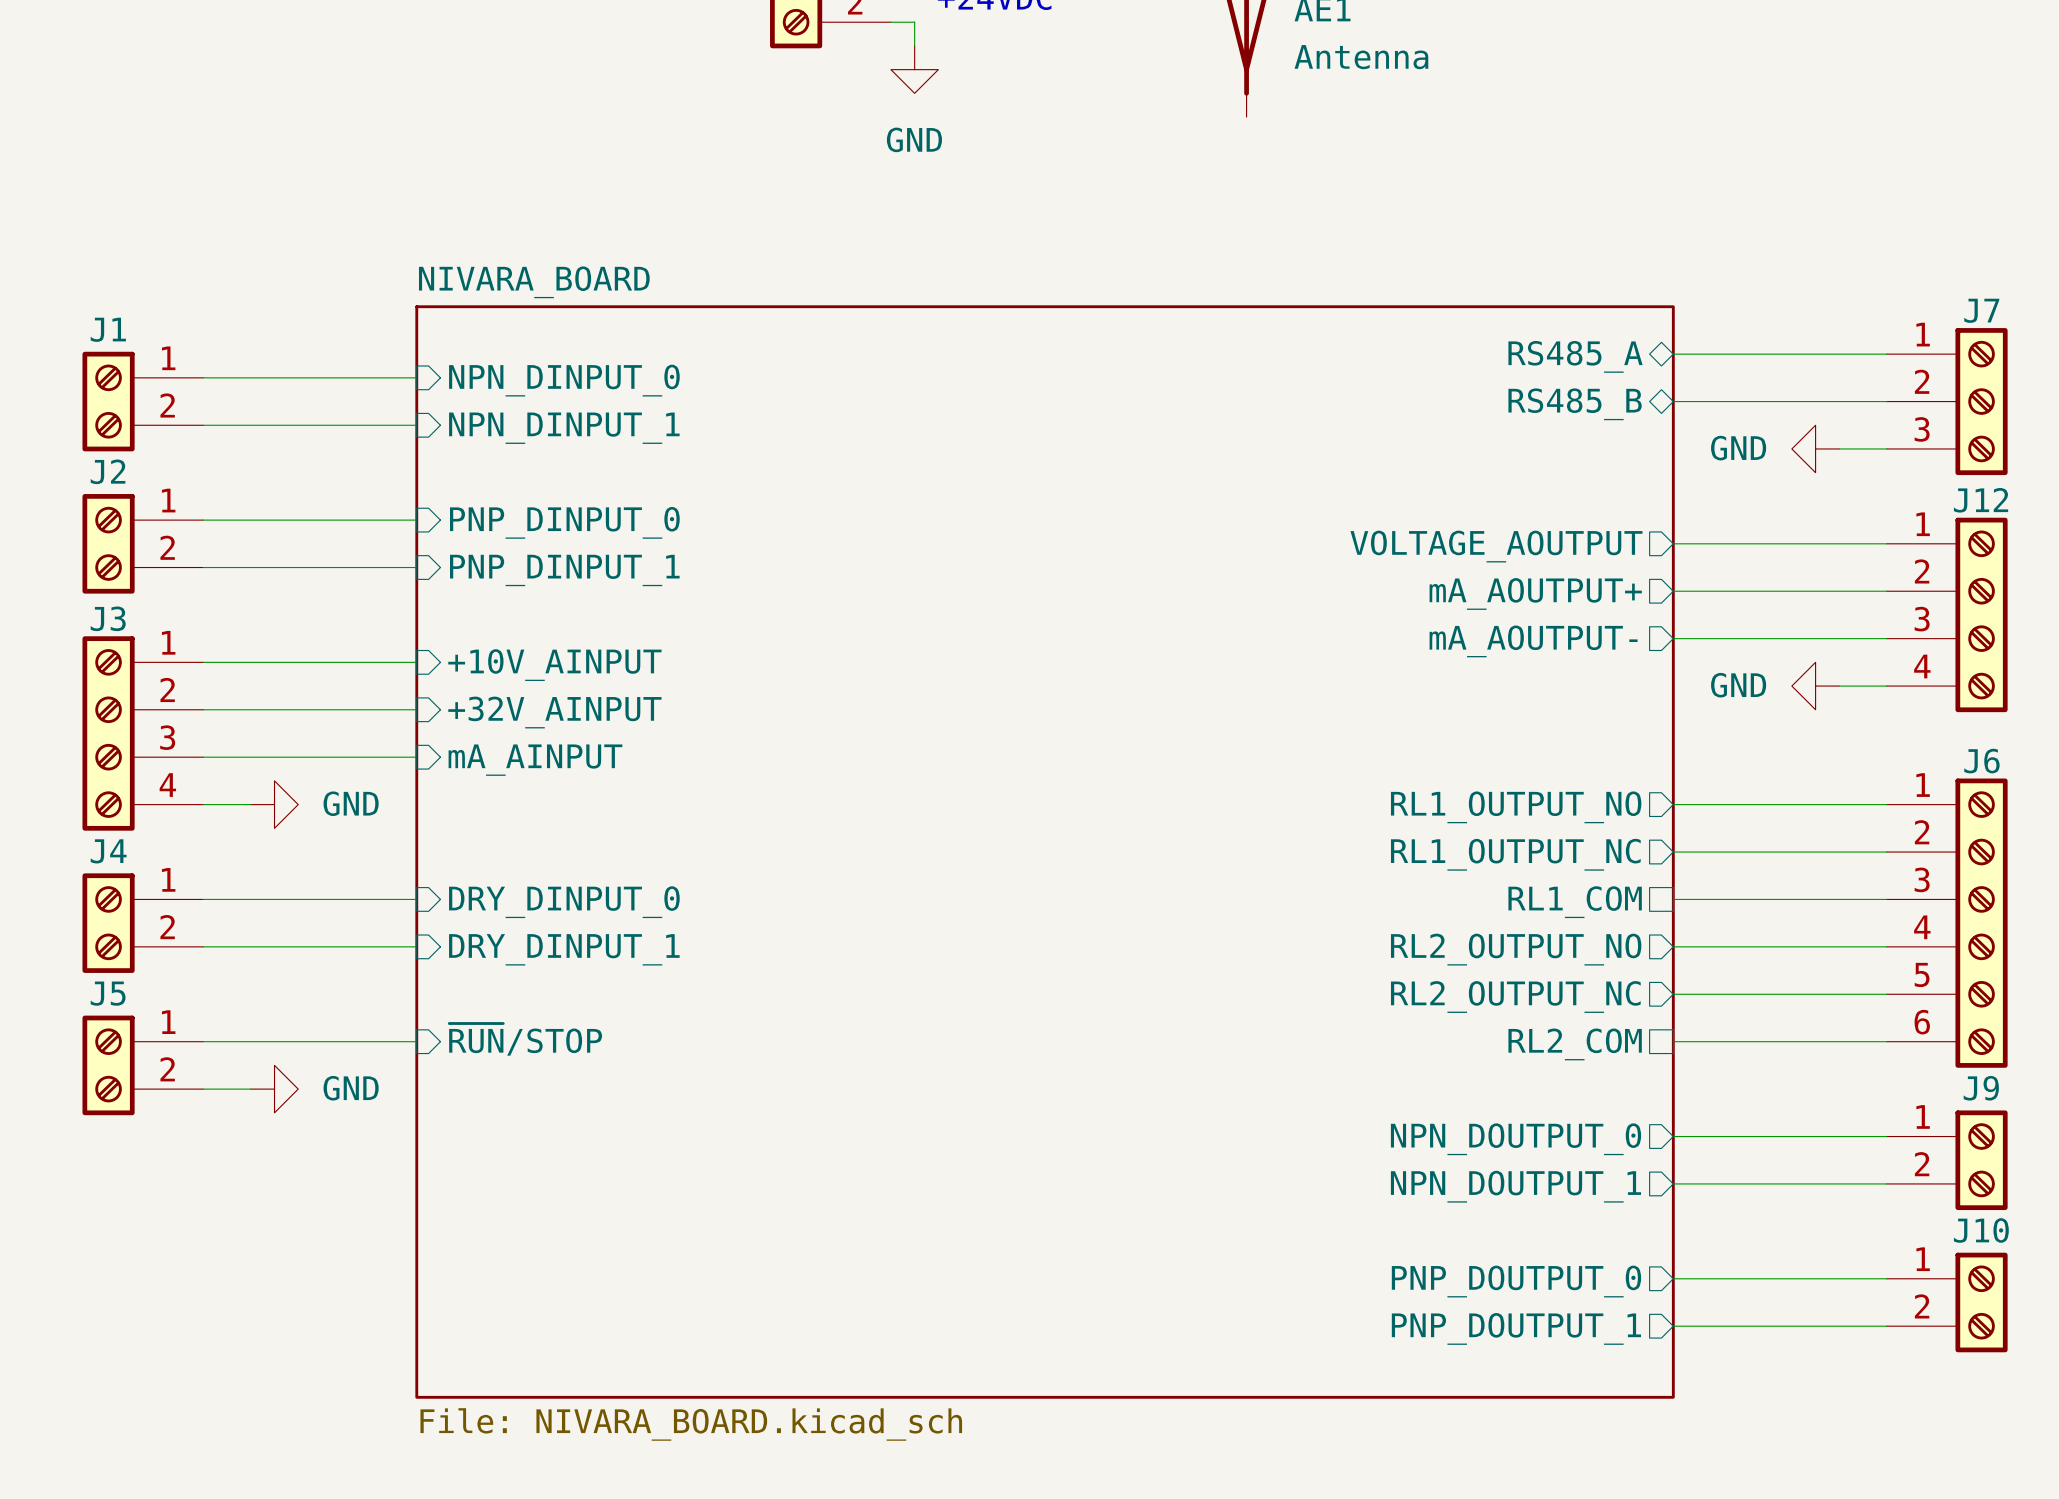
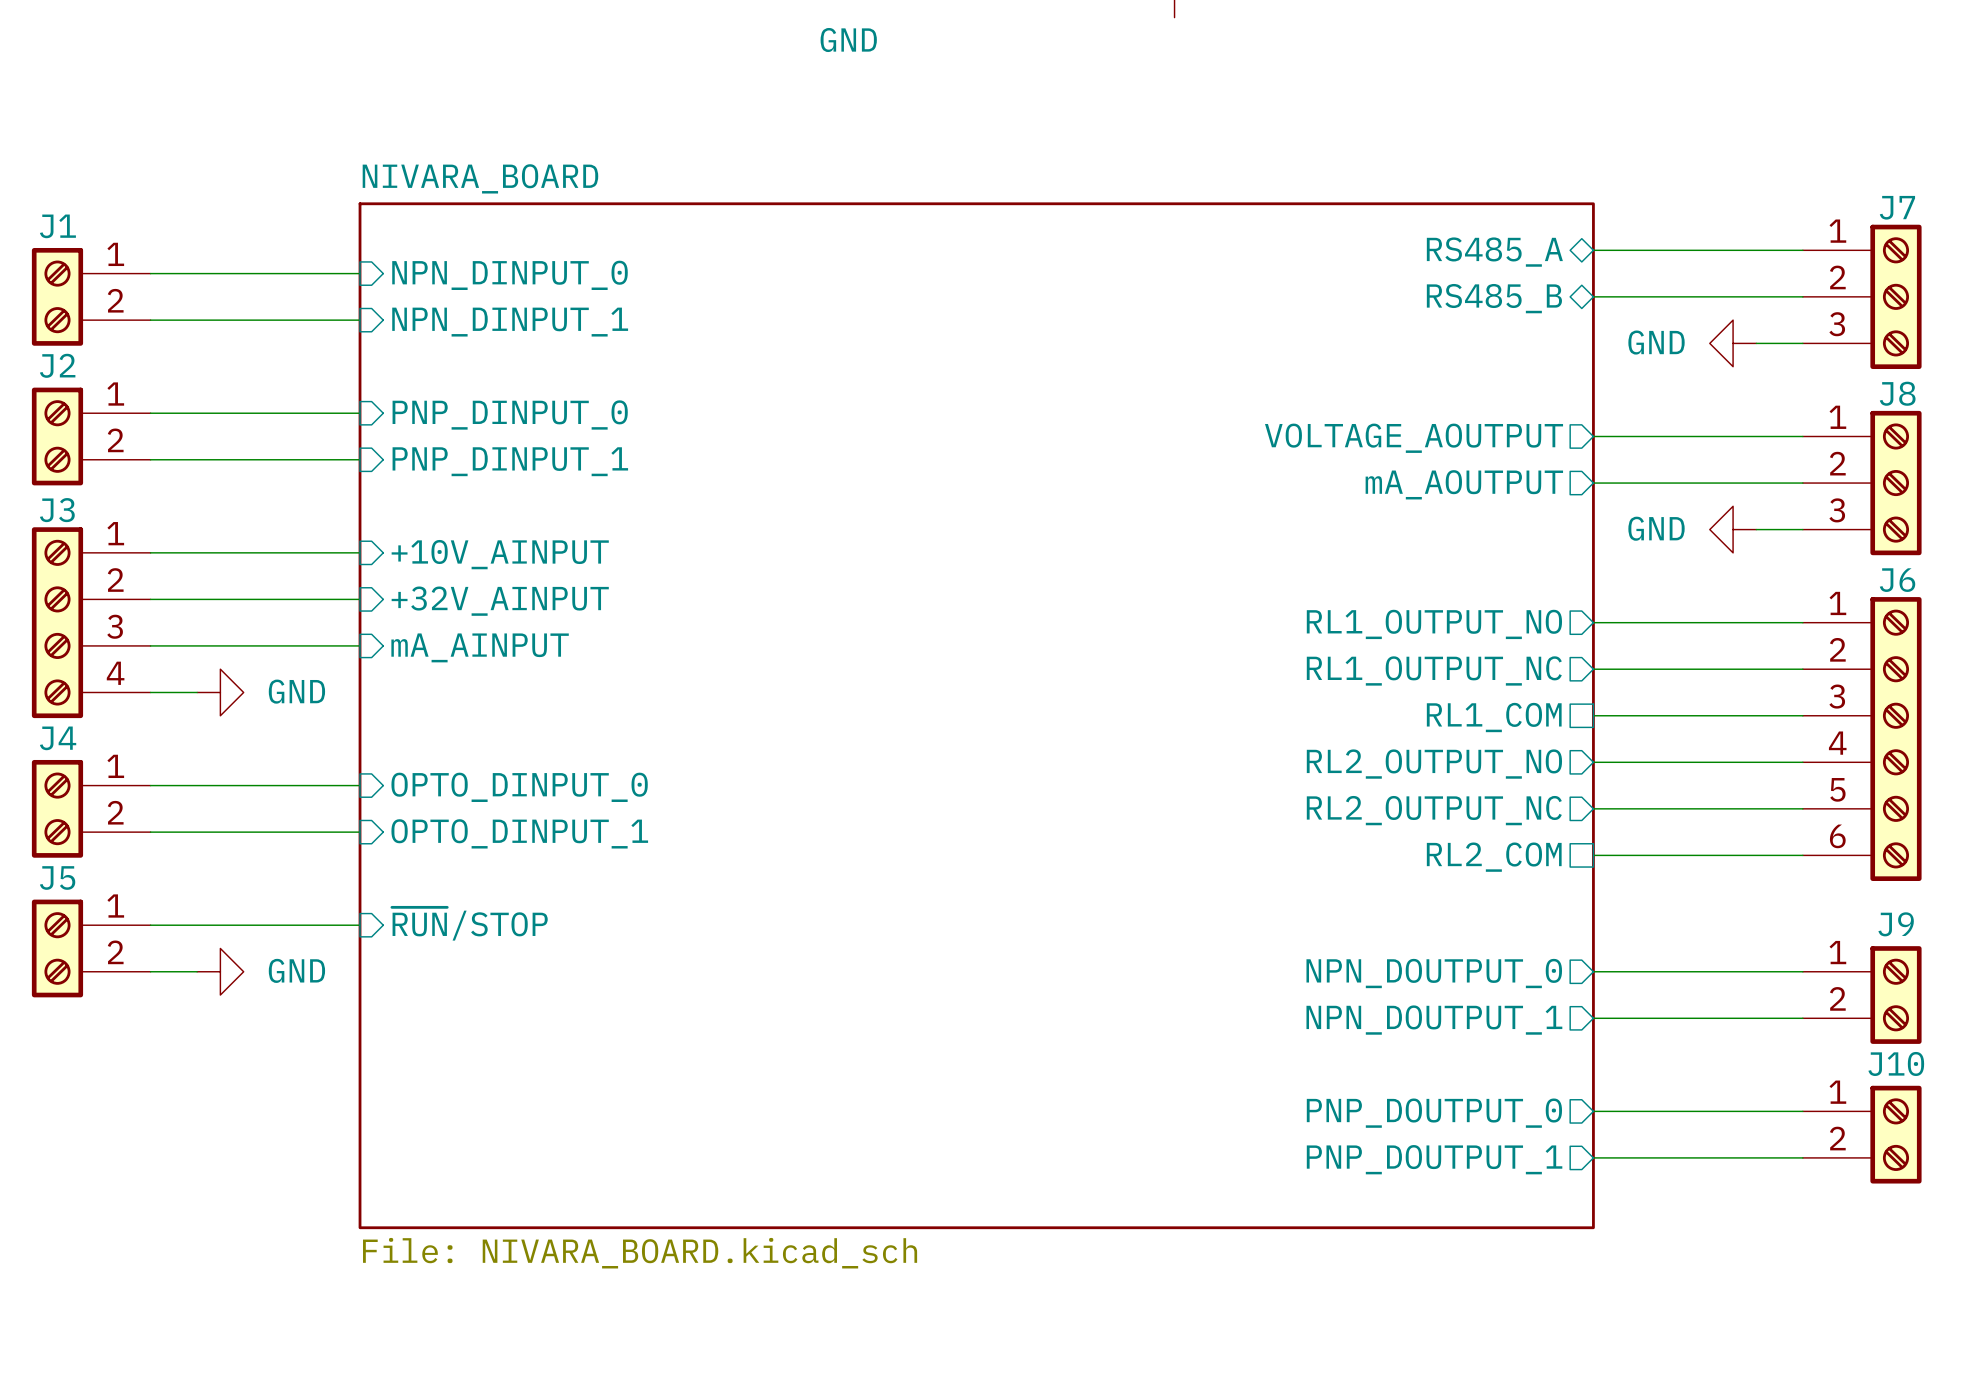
J8: none -> (1862, 483)
sheet pin: mA_AOUTPUT+ (1535, 593) -> mA_AOUTPUT (1464, 484)
J12: (1947, 614) -> none
wire: (1673, 638) (1839, 638) -> none
sheet pin: mA_AOUTPUT- (1533, 641) -> none
power symbol position: GND (1815, 686) -> GND (1733, 529)
wire: (1839, 686) (1886, 686) -> none
wire: (1673, 804) (1886, 804) -> (1593, 622) (1802, 622)
sheet pin position: RL1_OUTPUT_NO (1516, 807) -> RL1_OUTPUT_NO (1434, 624)
sheet NIVARA_BOARD: none -> File: NIVARA_BOARD.kicad_sch (976, 715)
sheet NIVARA_BOARD: File: NIVARA_BOARD.kicad_sch (1045, 852) -> none
wire: (1673, 852) (1886, 852) -> (1593, 669) (1802, 669)
sheet pin position: RL1_OUTPUT_NC (1515, 854) -> RL1_OUTPUT_NC (1434, 670)
wire: (1673, 899) (1886, 899) -> (1593, 715) (1802, 715)
sheet pin: DRY_DINPUT_0 (564, 902) -> OPTO_DINPUT_0 (519, 787)
sheet pin position: RL1_COM (1575, 902) -> RL1_COM (1494, 717)
J6 position: (1947, 923) -> (1862, 739)
wire: (1673, 946) (1886, 946) -> (1593, 762) (1802, 762)
sheet pin: DRY_DINPUT_1 (564, 949) -> OPTO_DINPUT_1 (519, 833)
sheet pin position: RL2_OUTPUT_NO (1516, 949) -> RL2_OUTPUT_NO (1434, 764)
wire: (1673, 994) (1886, 994) -> (1593, 808) (1802, 808)
sheet pin position: RL2_OUTPUT_NC (1515, 997) -> RL2_OUTPUT_NC (1434, 810)
wire: (1673, 1041) (1886, 1041) -> (1593, 855) (1802, 855)
sheet pin position: RL2_COM (1575, 1044) -> RL2_COM (1494, 857)
sheet pin: none -> NPN_DOUTPUT_0 (1434, 973)
sheet pin: NPN_DOUTPUT_0 (1516, 1139) -> NPN_DOUTPUT_1 (1434, 1020)
J9 position: (1947, 1160) -> (1862, 995)
wire: (1673, 1183) (1886, 1183) -> (1593, 1111) (1802, 1111)
sheet pin: NPN_DOUTPUT_1 (1515, 1186) -> PNP_DOUTPUT_0 (1434, 1113)
sheet pin: PNP_DOUTPUT_0 (1516, 1281) -> PNP_DOUTPUT_1 (1434, 1159)
J10 position: (1947, 1302) -> (1862, 1134)
wire: (1673, 1326) (1886, 1326) -> (1593, 971) (1802, 971)
sheet pin: PNP_DOUTPUT_1 (1516, 1328) -> none

